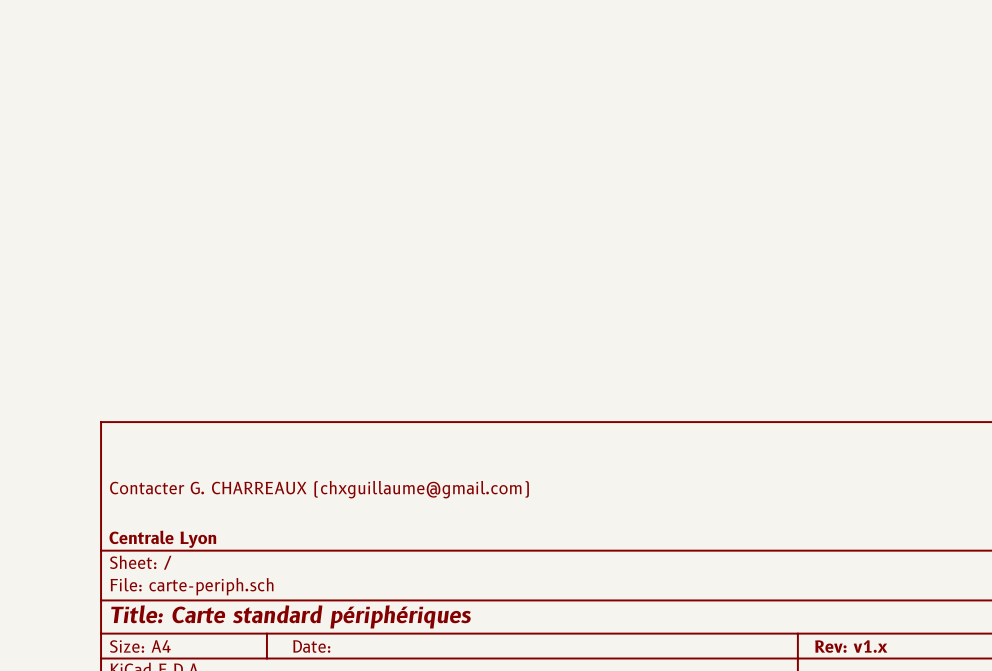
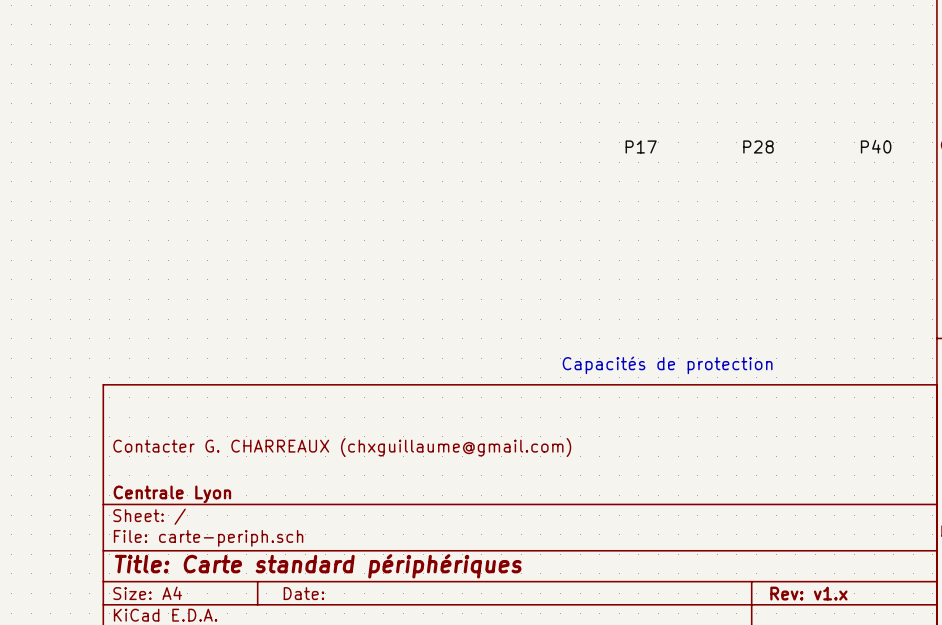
label: none -> P17 (641, 146)
label: none -> P28 (758, 146)
label: none -> P40 (876, 146)
text: none -> Capacités de protection (667, 365)

